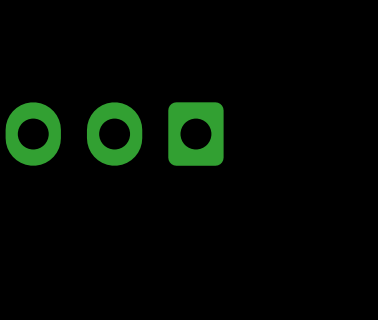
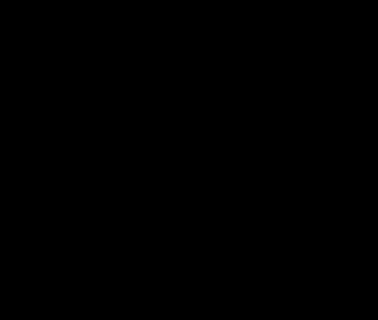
part: (114, 134) -> none

